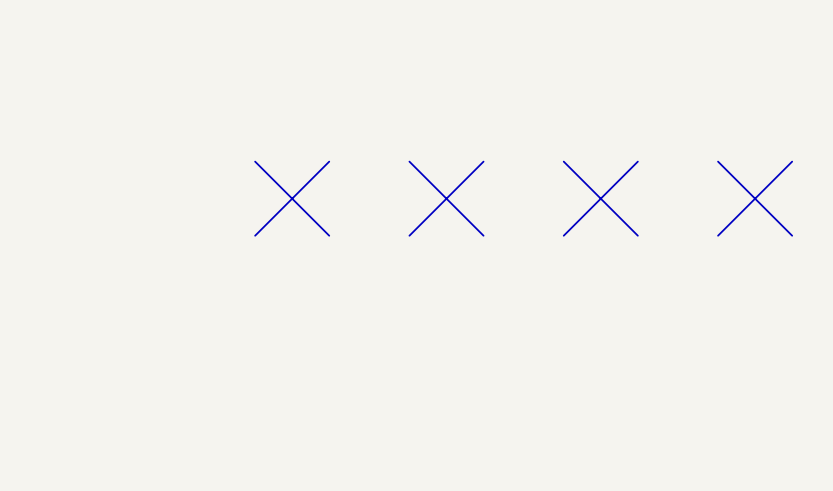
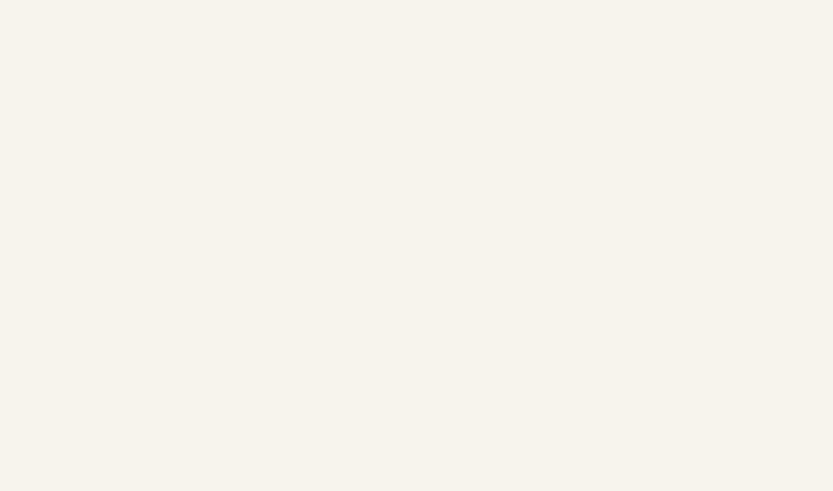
no-connect mark: (292, 198) -> none
no-connect mark: (446, 198) -> none
no-connect mark: (600, 198) -> none
no-connect mark: (755, 198) -> none

